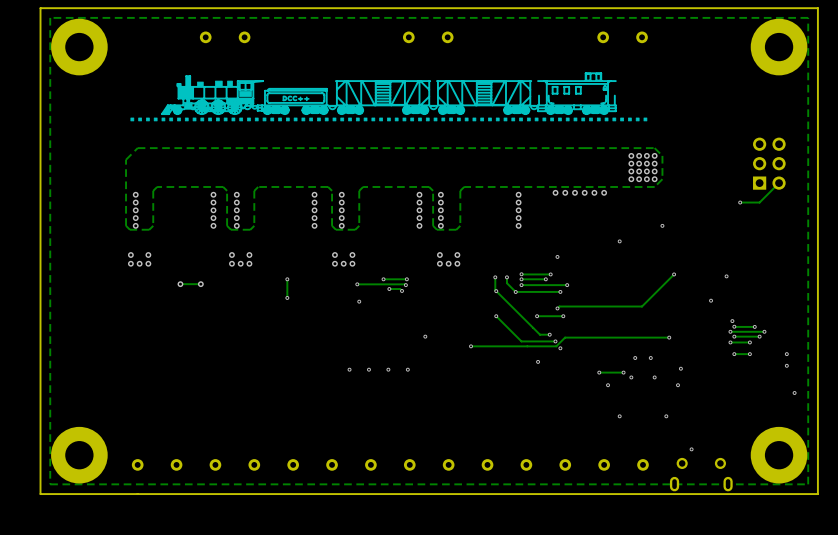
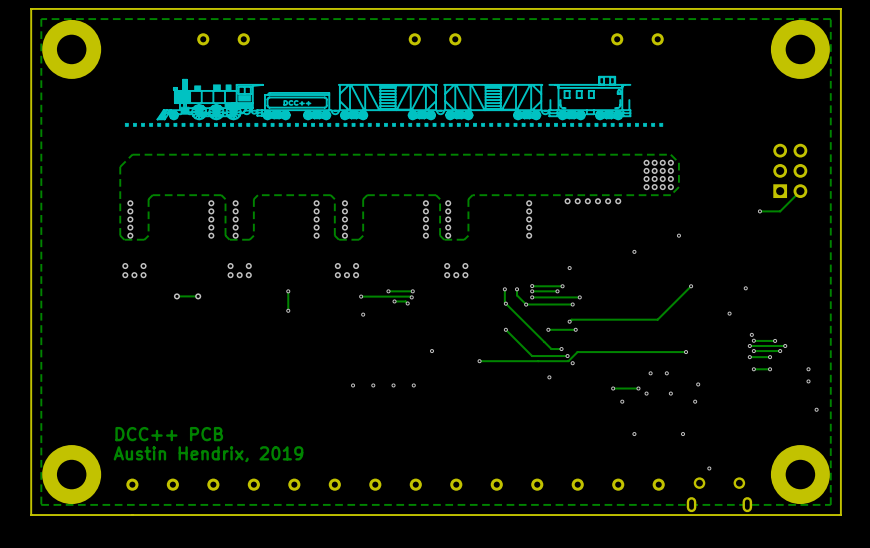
text: none -> DCC++ PCB (169, 434)
text: none -> Austin Hendrix, 2019 (208, 454)

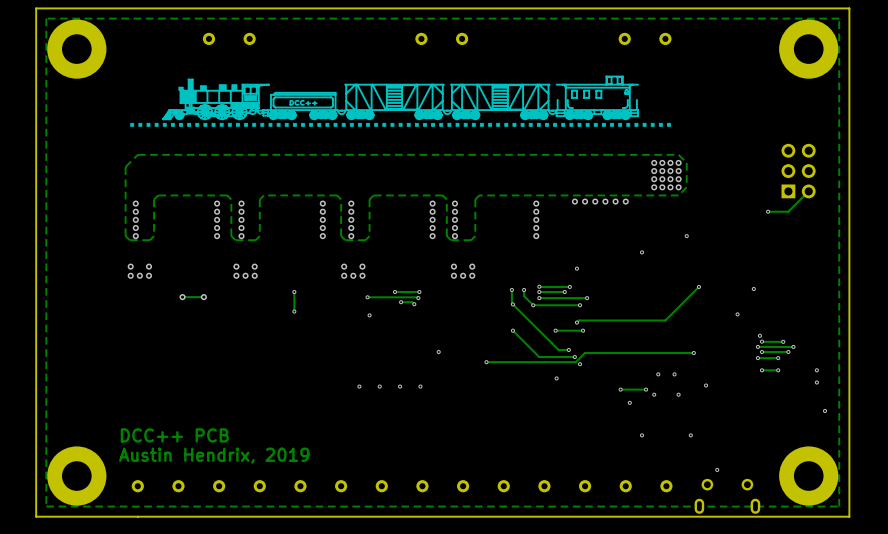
via: (695, 401) -> none

